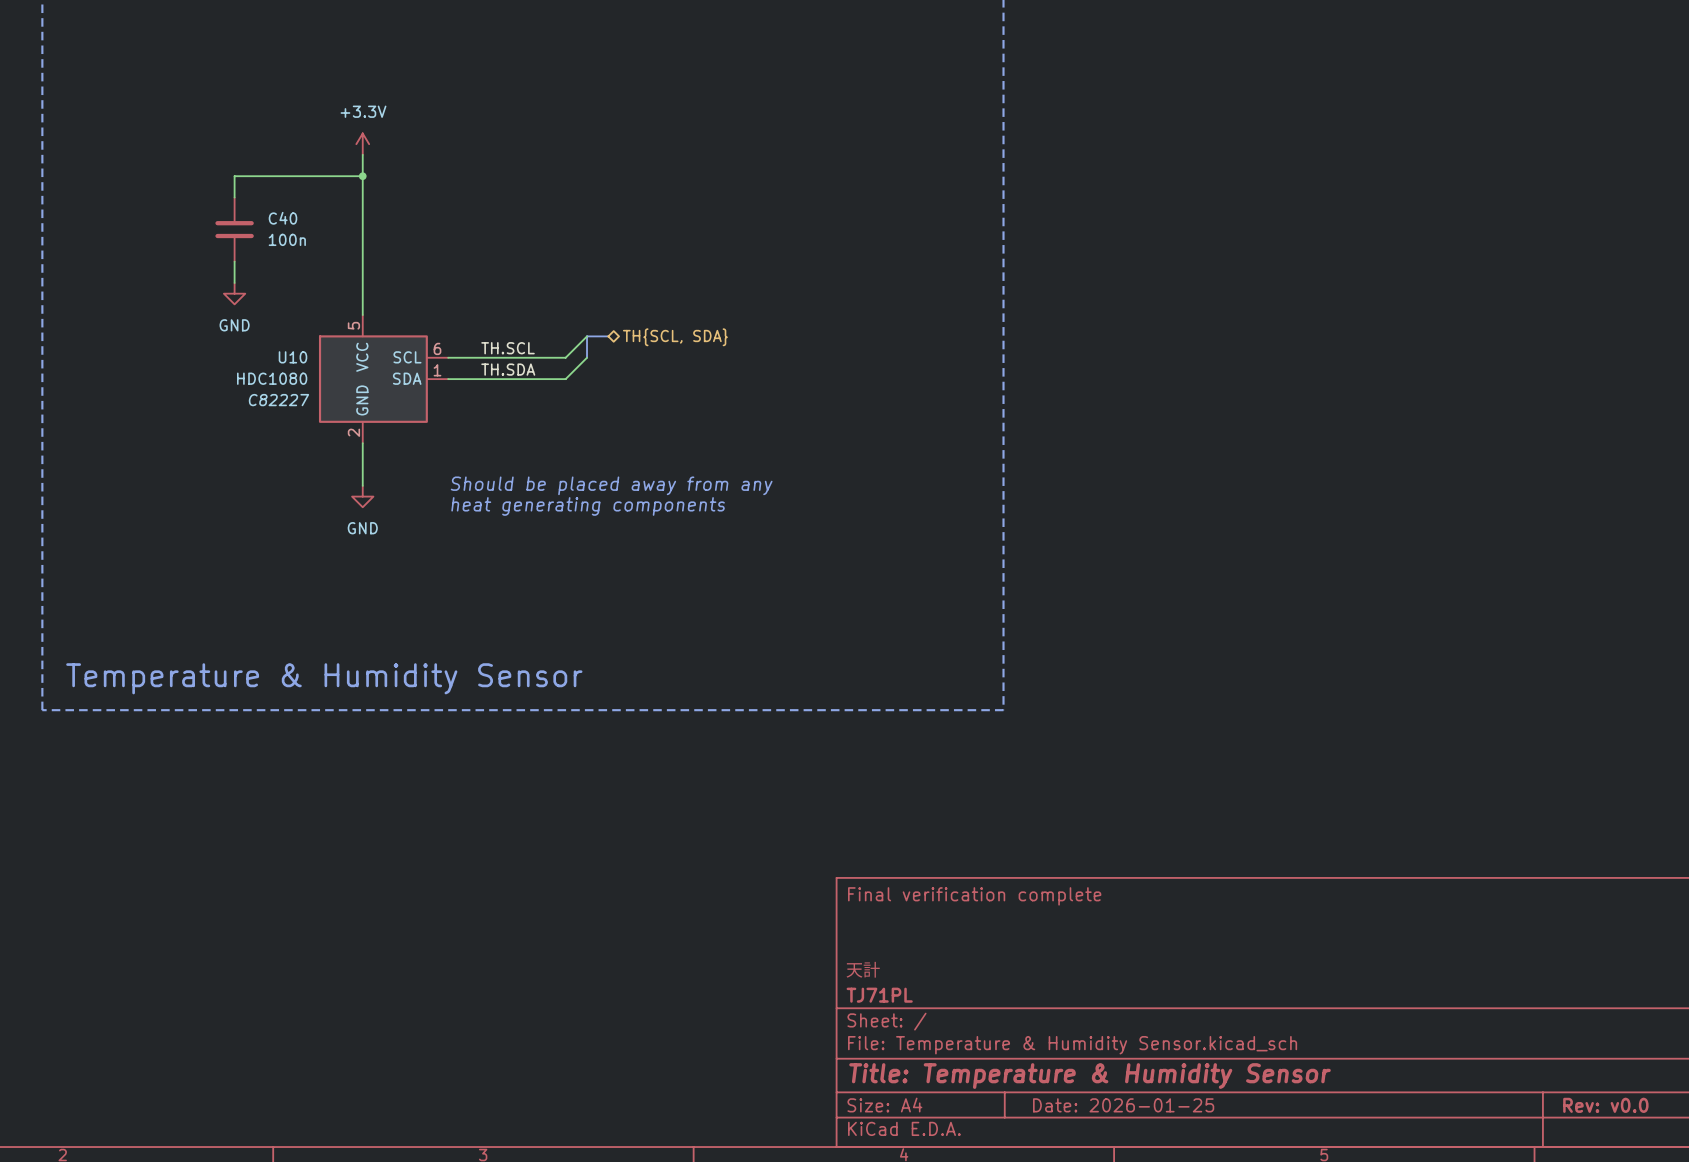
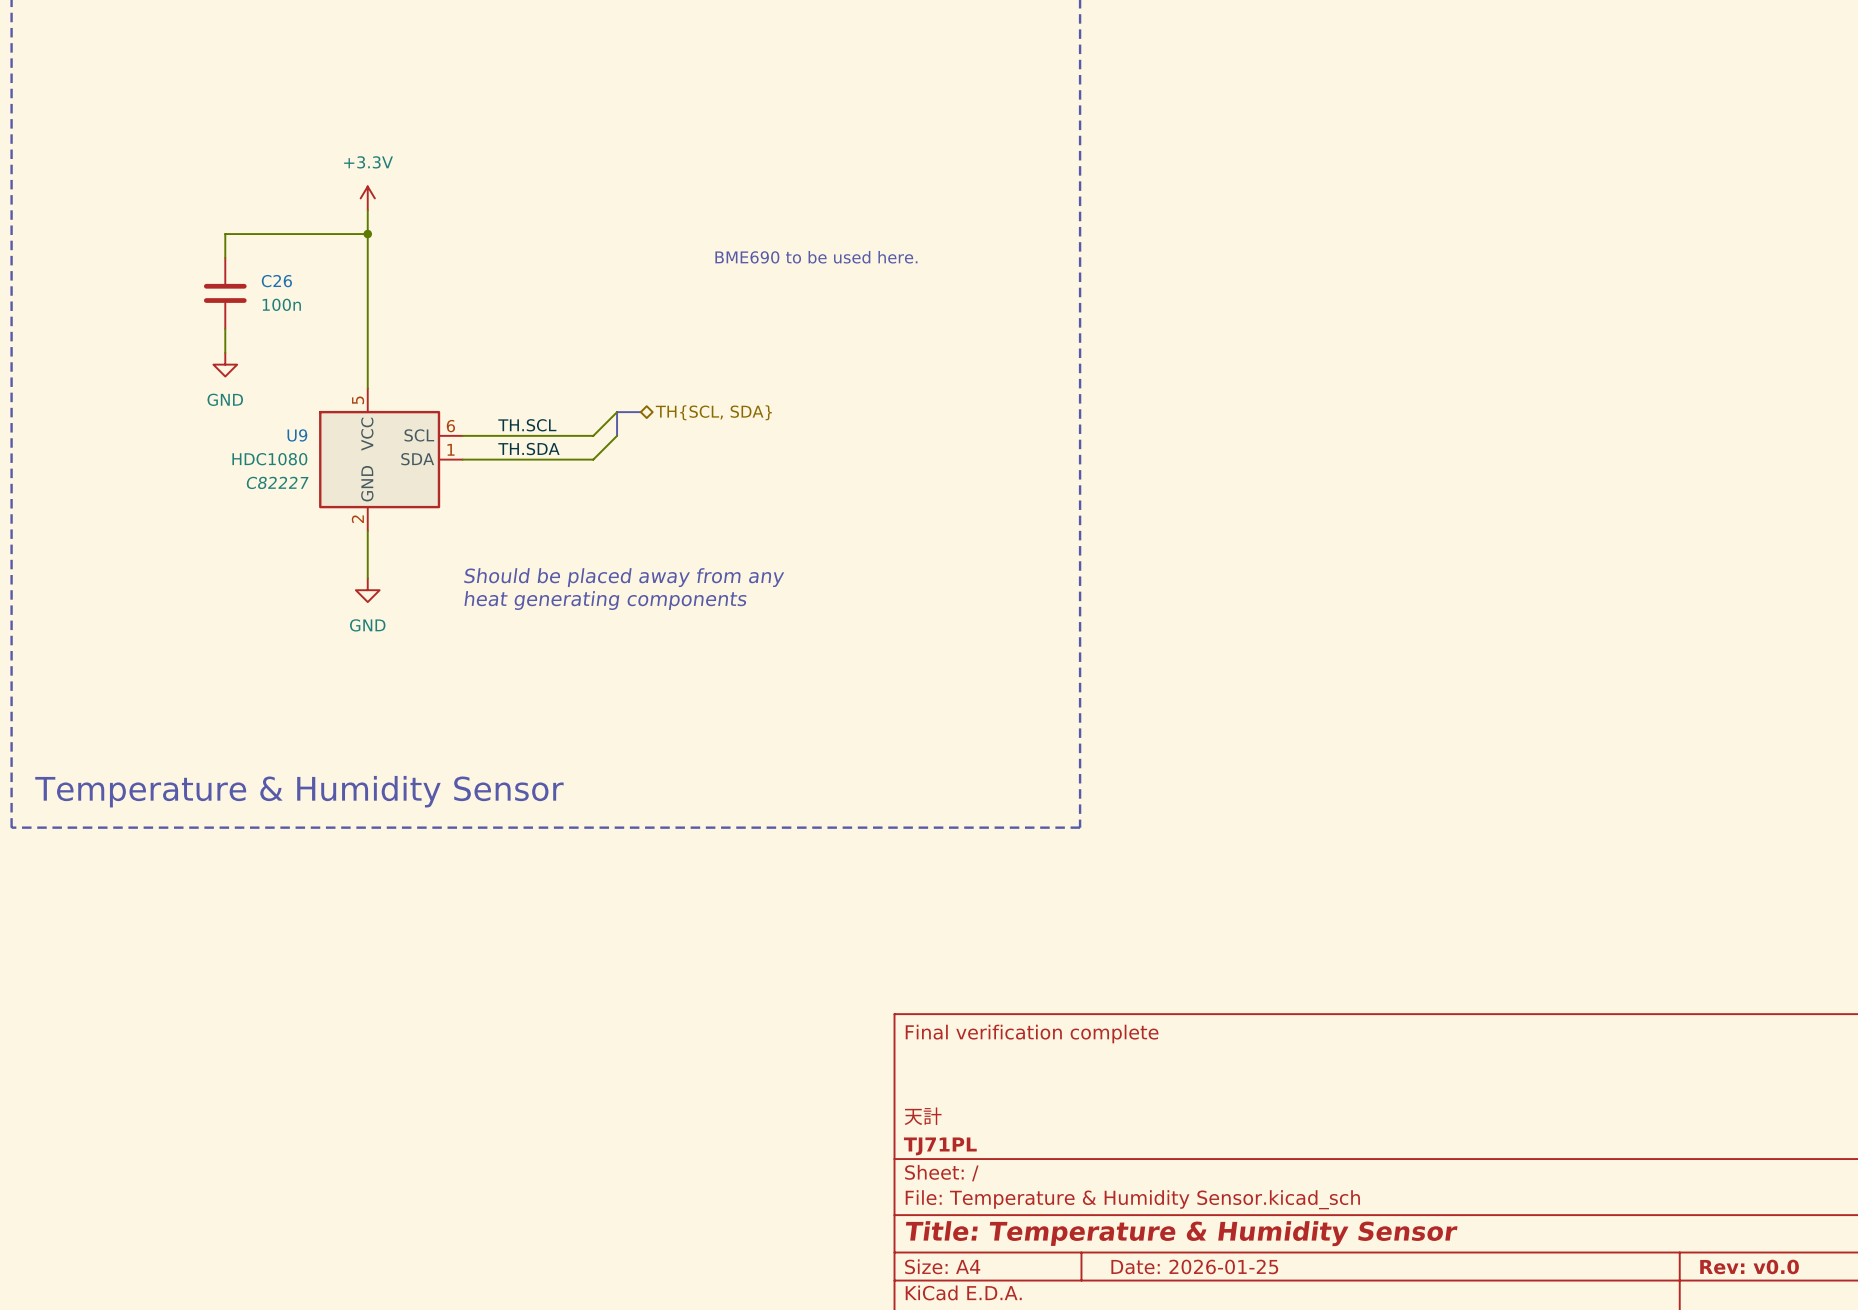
text: none -> BME690 to be used here. (816, 257)
C40 name: C40 (282, 218) -> C26 (276, 281)
U10 name: U10 (292, 357) -> U9 (297, 435)

